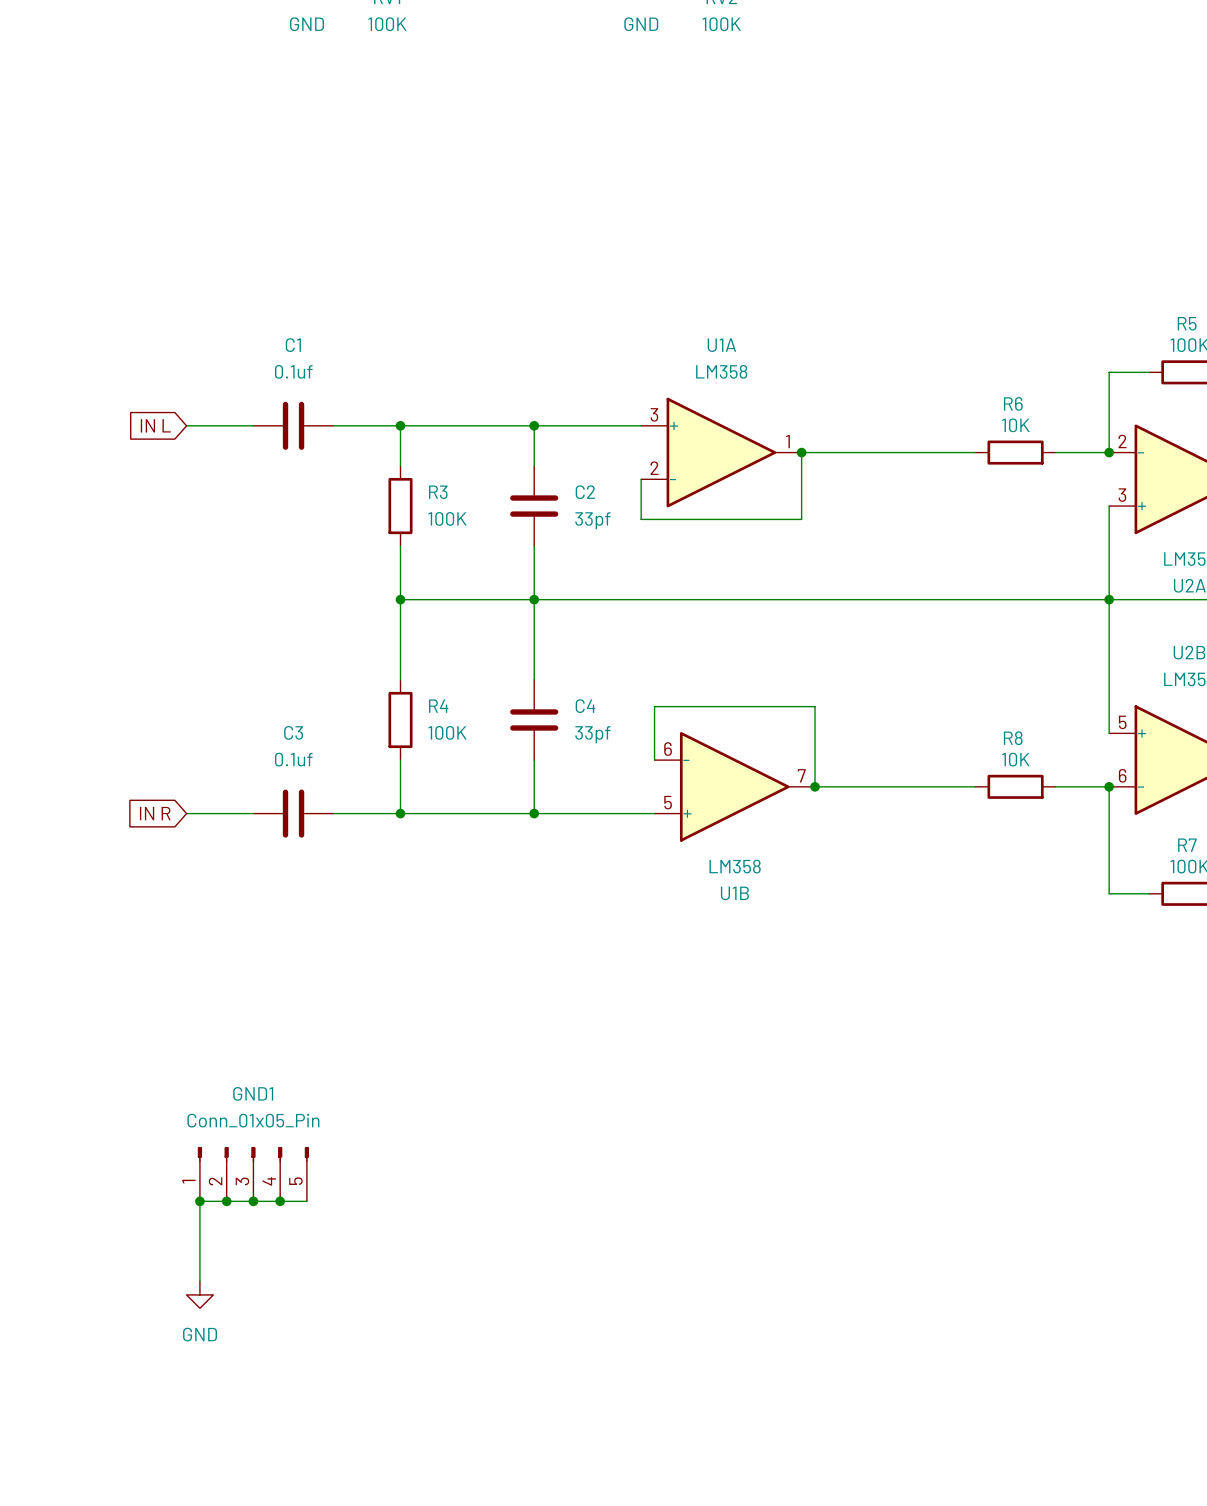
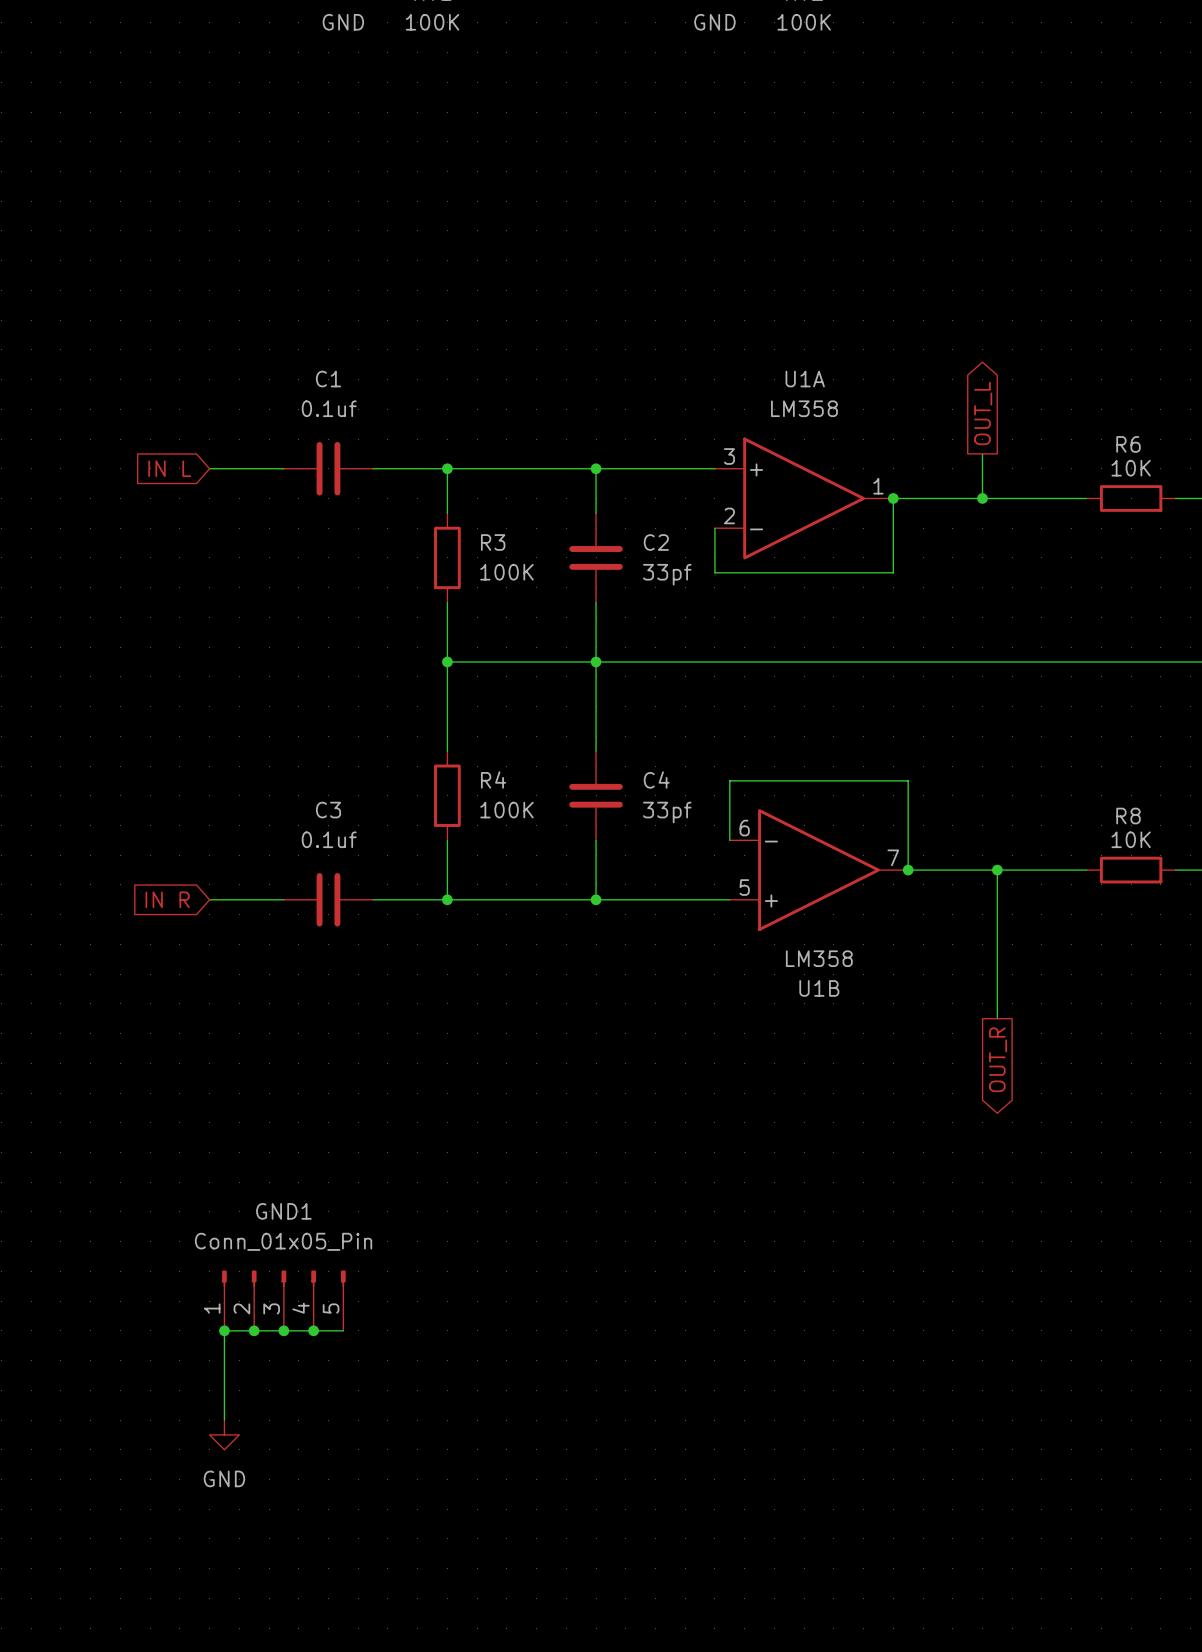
global label: none -> OUT_L (983, 413)
wire: none -> (982, 453) (982, 498)
junction: none -> (982, 498)
wire: none -> (997, 870) (997, 1018)
junction: none -> (997, 870)
global label: none -> OUT_R (998, 1059)

